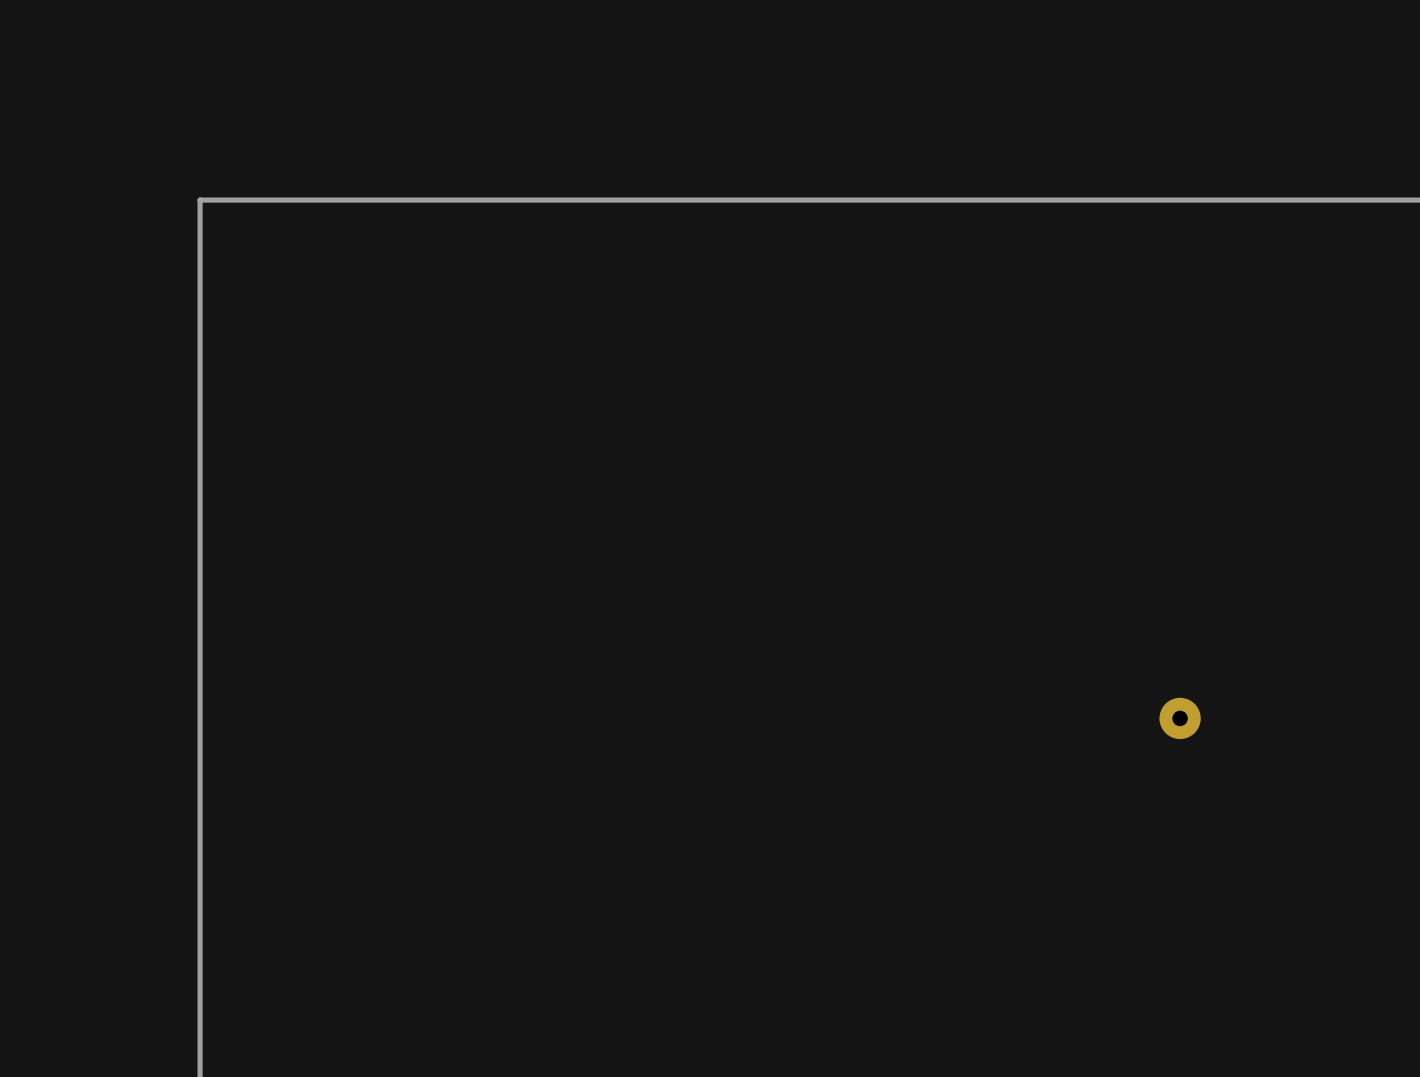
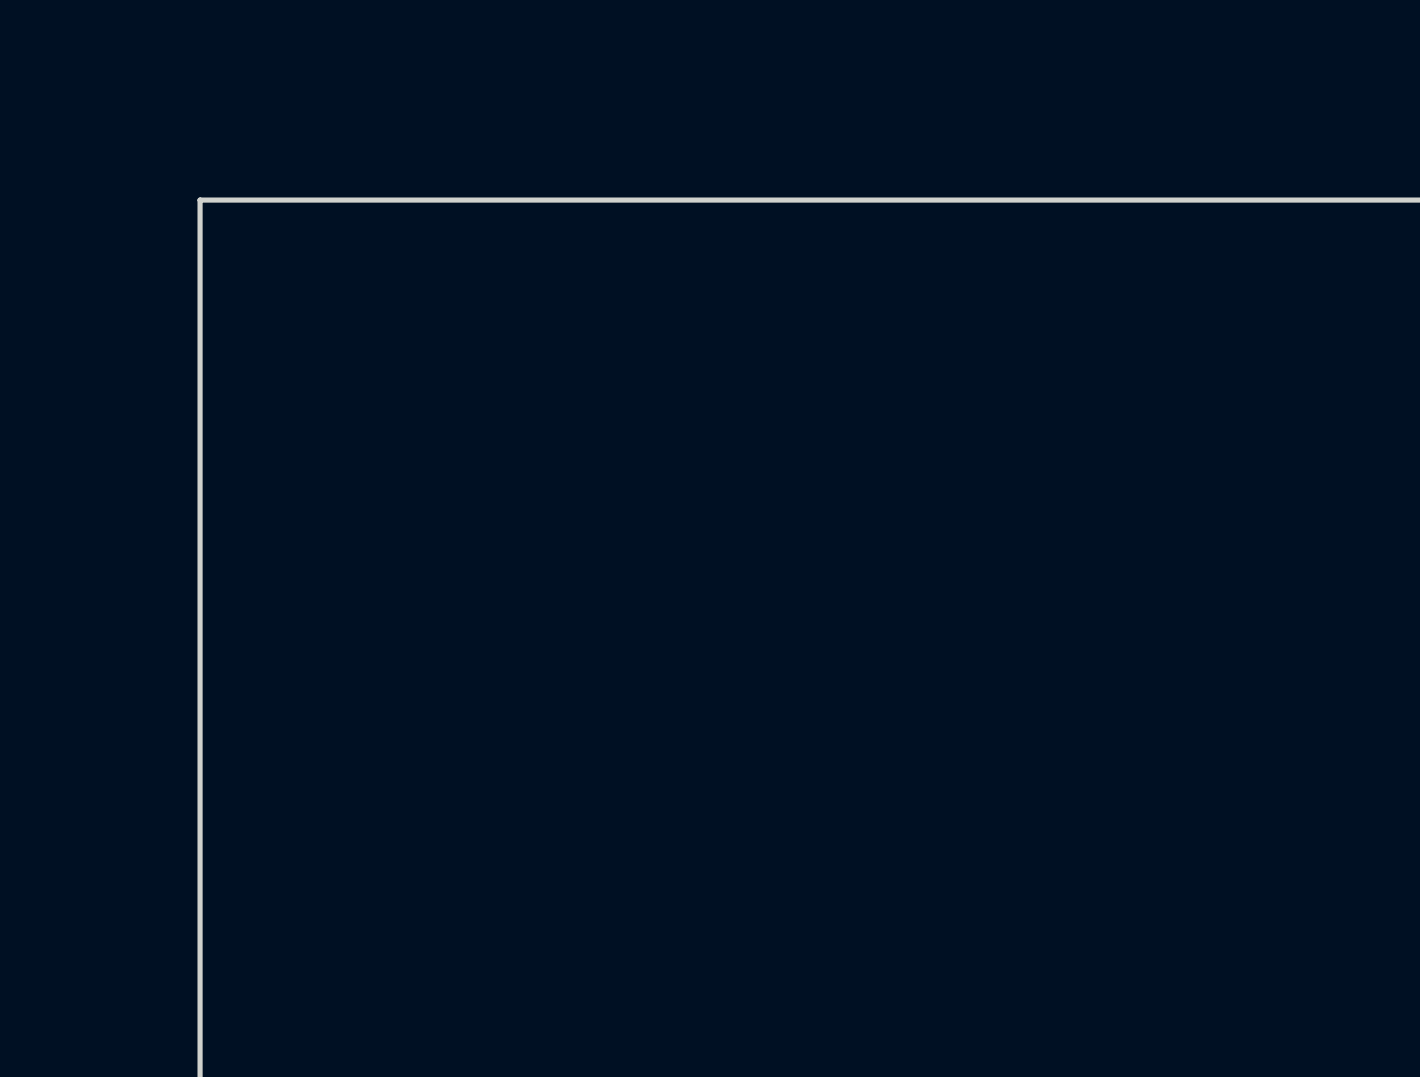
via: (1180, 718) -> none

